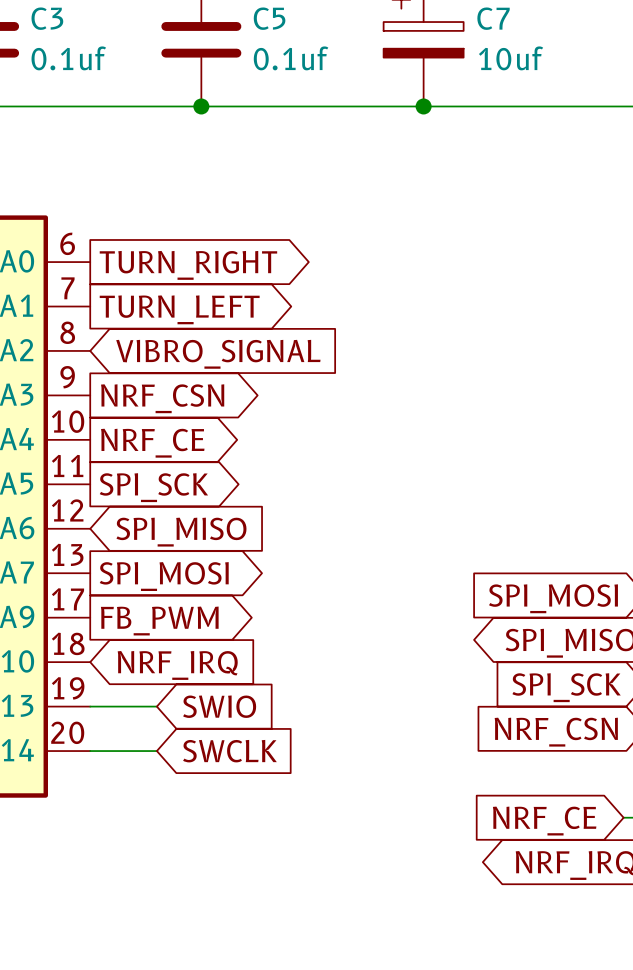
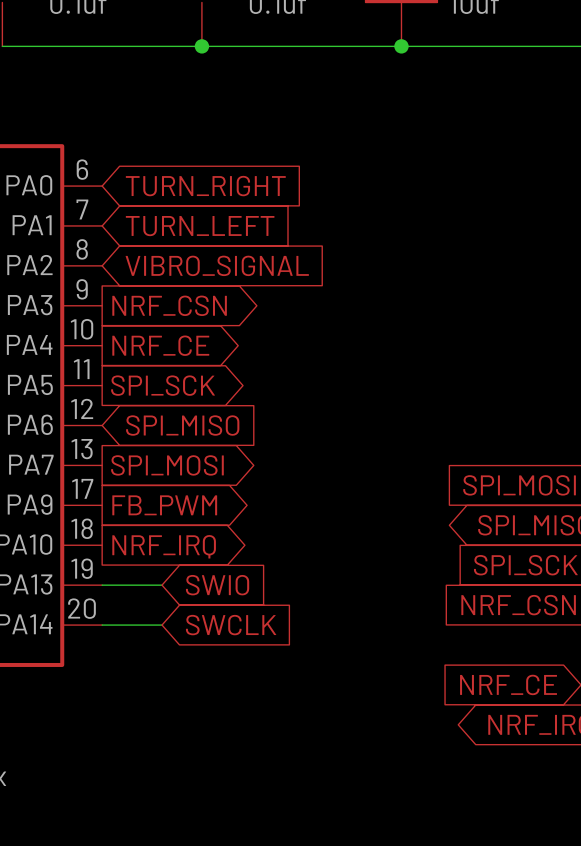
global label shape: output (188, 265) -> input (205, 186)
global label shape: output (179, 309) -> input (200, 226)
global label shape: input (177, 665) -> output (164, 546)

